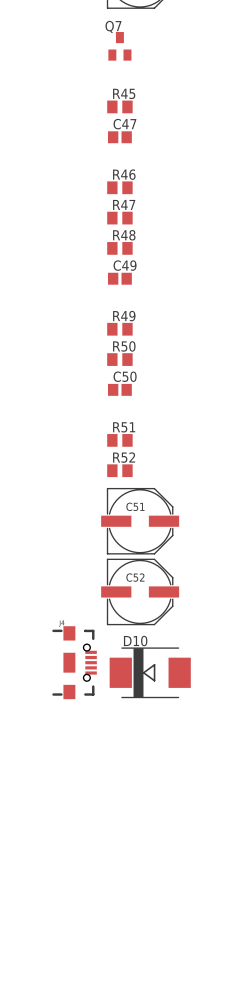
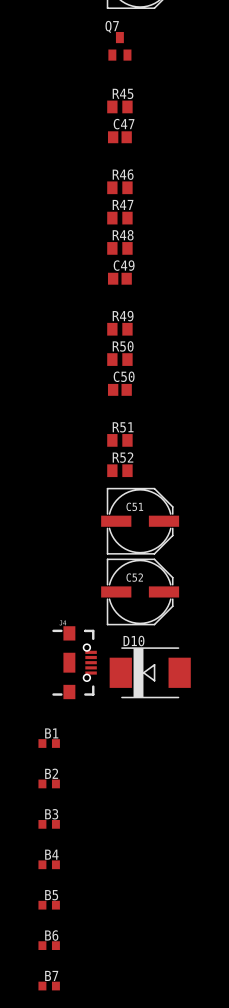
B1: none -> (49, 743)
B2: none -> (49, 783)
B3: none -> (49, 824)
B4: none -> (49, 864)
B5: none -> (49, 905)
B6: none -> (49, 945)
B7: none -> (49, 986)

